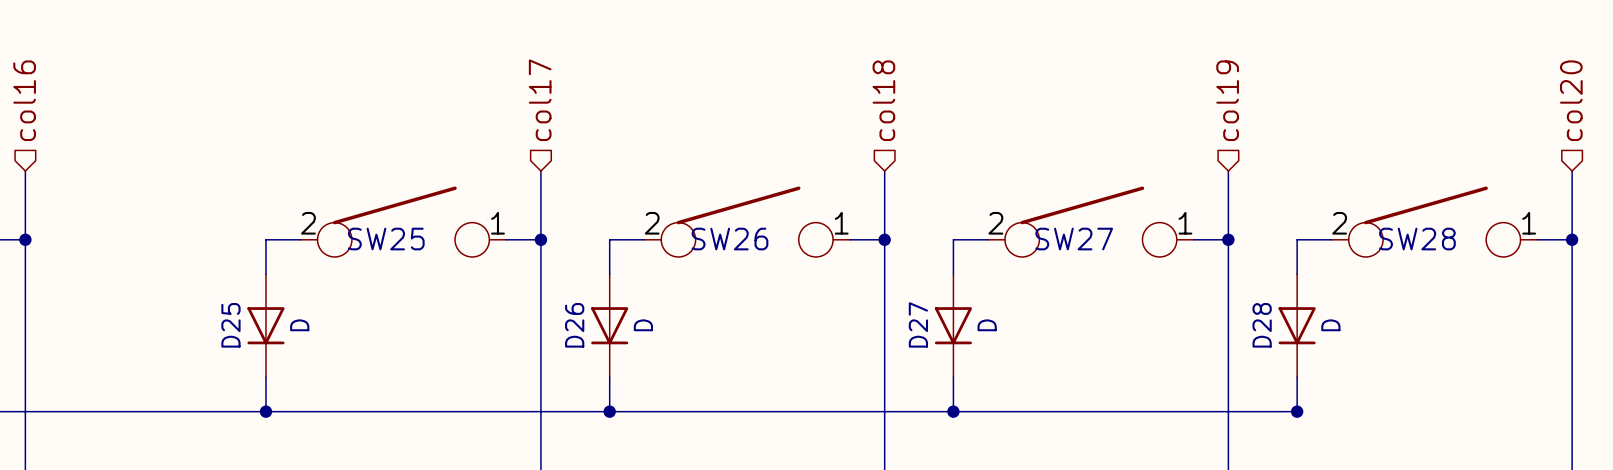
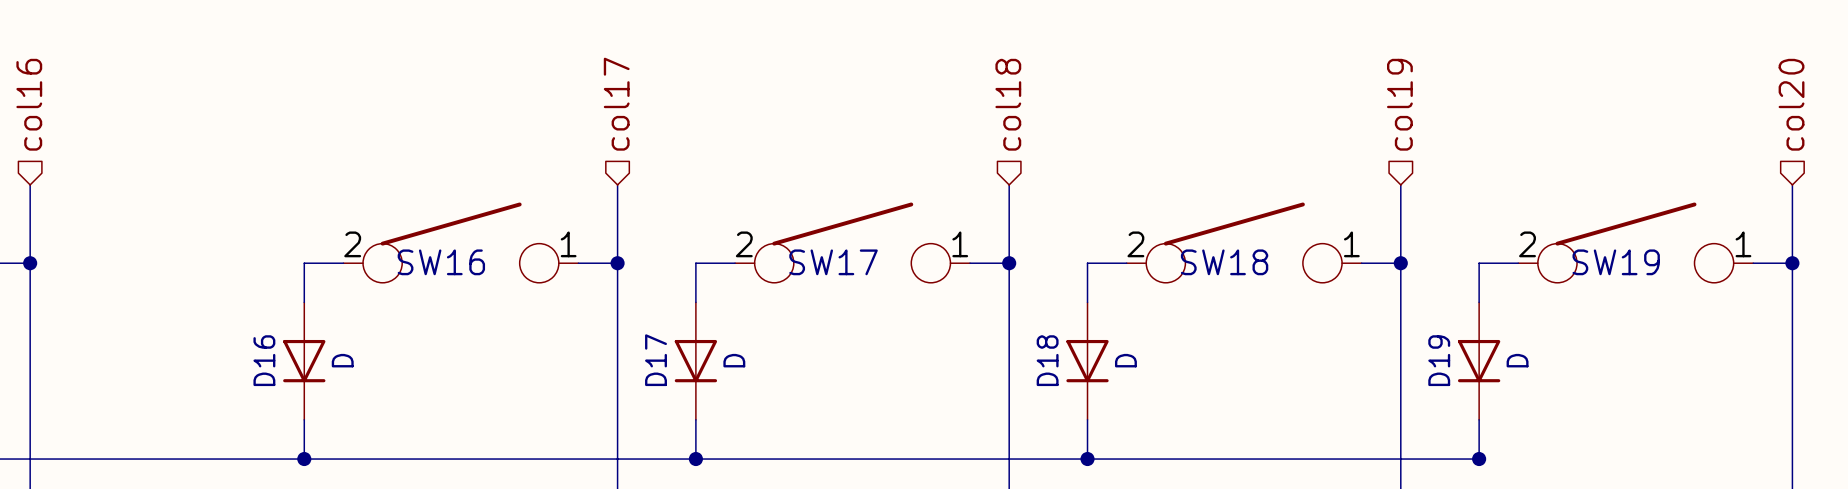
SW25 name: SW25 (386, 239) -> SW16 (441, 262)
SW26 name: SW26 (730, 239) -> SW17 (833, 262)
SW27 name: SW27 (1074, 239) -> SW18 (1224, 262)
SW28 name: SW28 (1417, 239) -> SW19 (1616, 262)
D27 name: D27 (918, 324) -> D18 (1047, 360)
D25 name: D25 (230, 325) -> D16 (264, 360)
D26 name: D26 (574, 325) -> D17 (656, 360)
D28 name: D28 (1262, 325) -> D19 (1439, 360)

